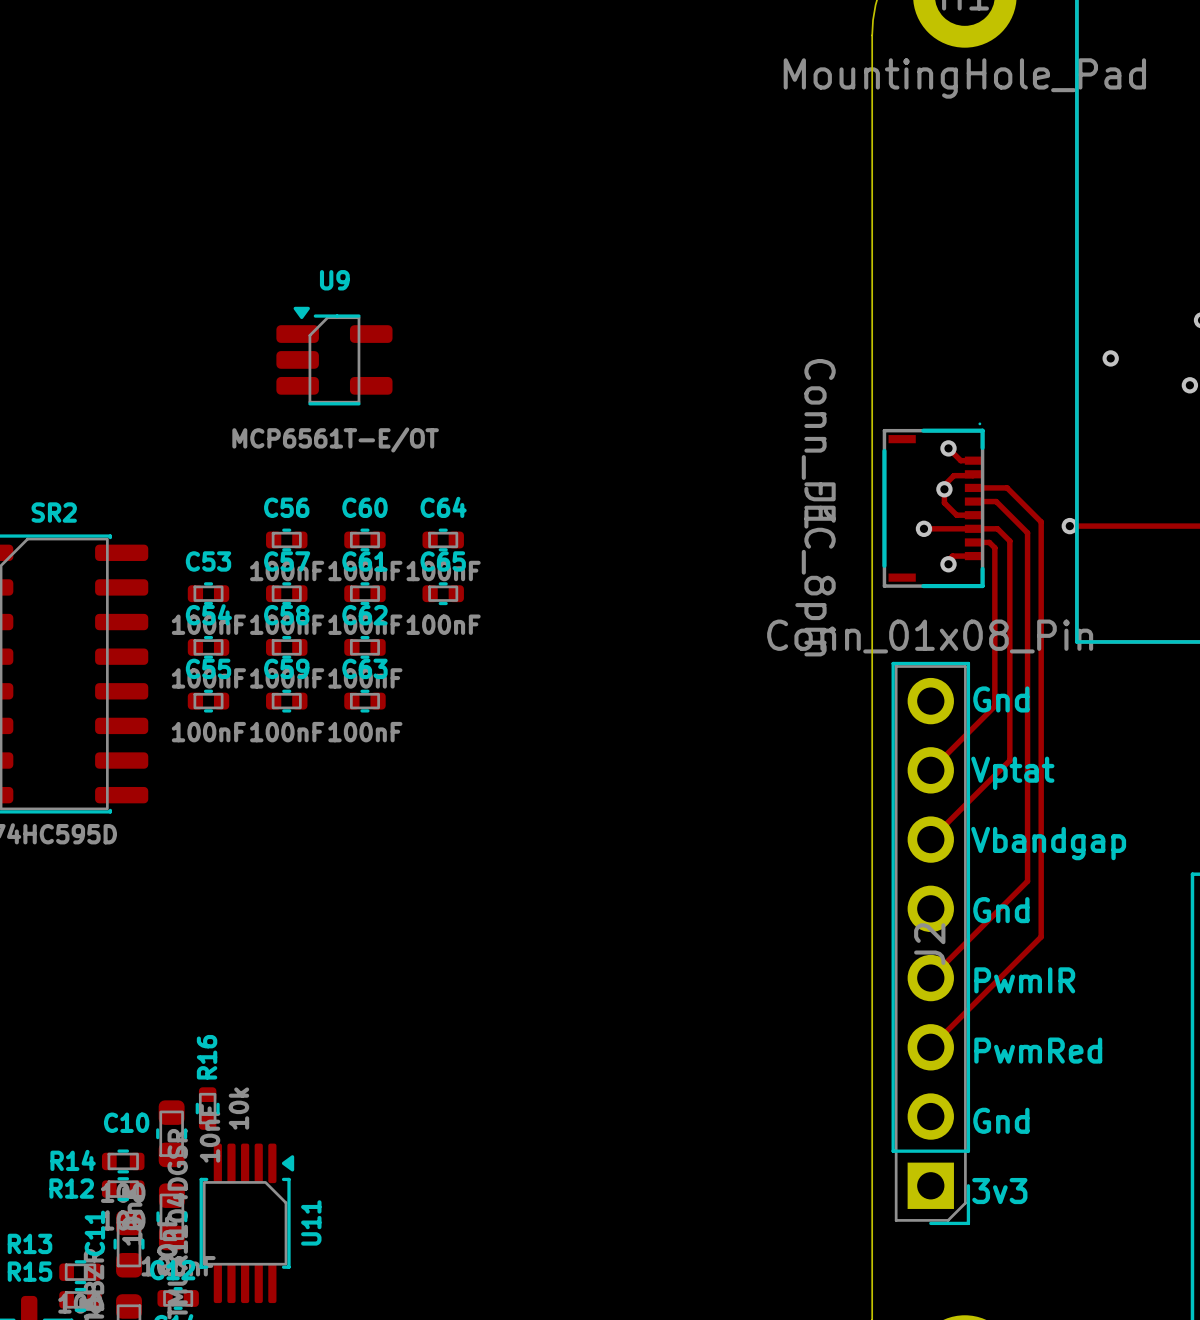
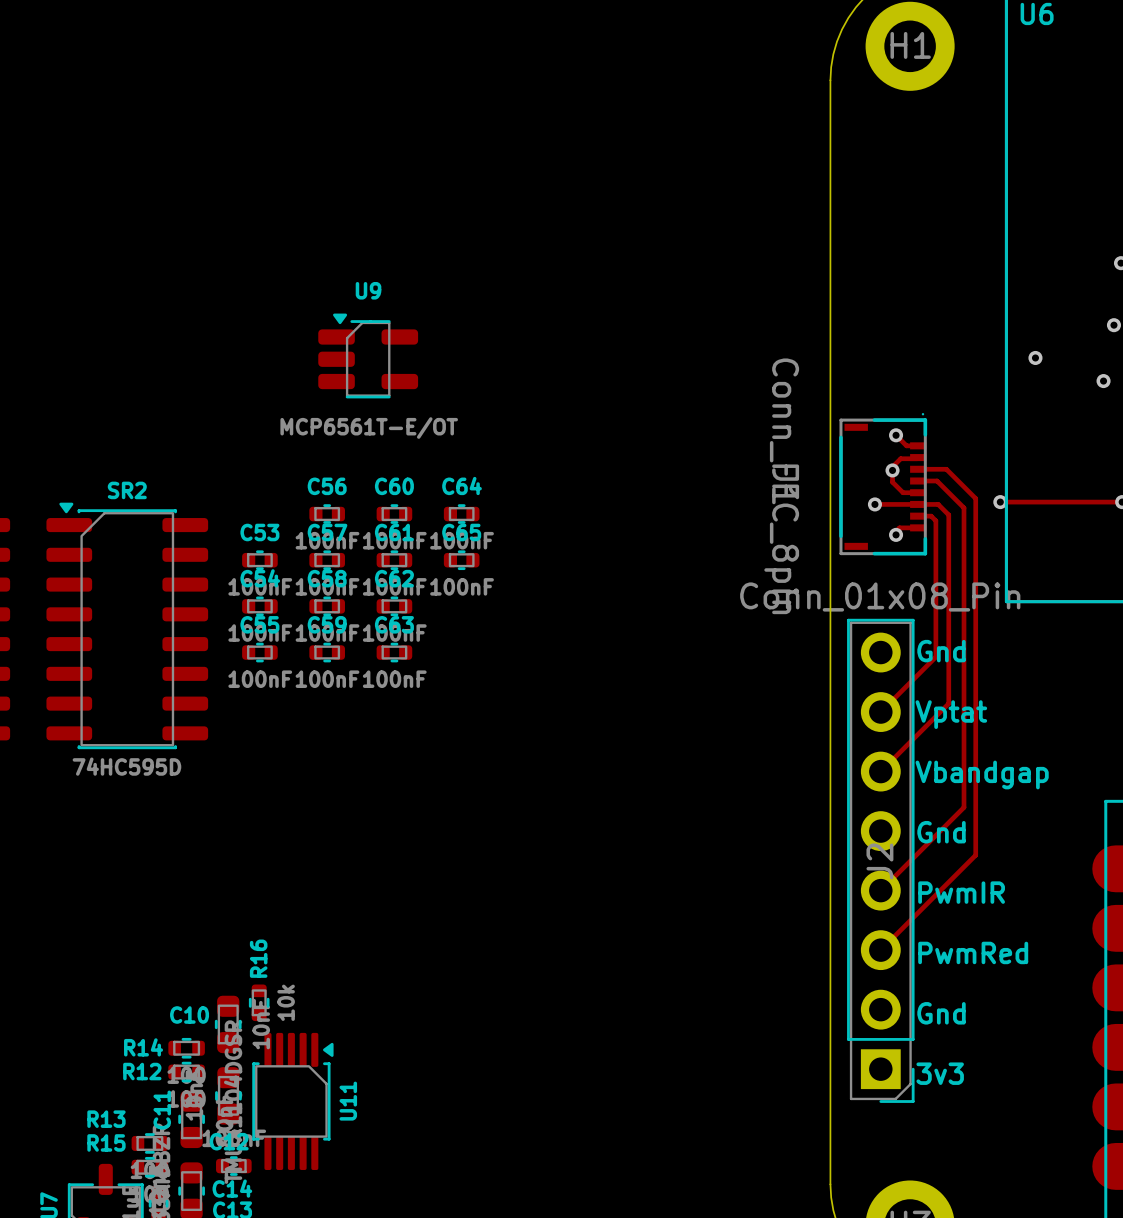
H1 value: MountingHole_Pad (964, 78) -> none

